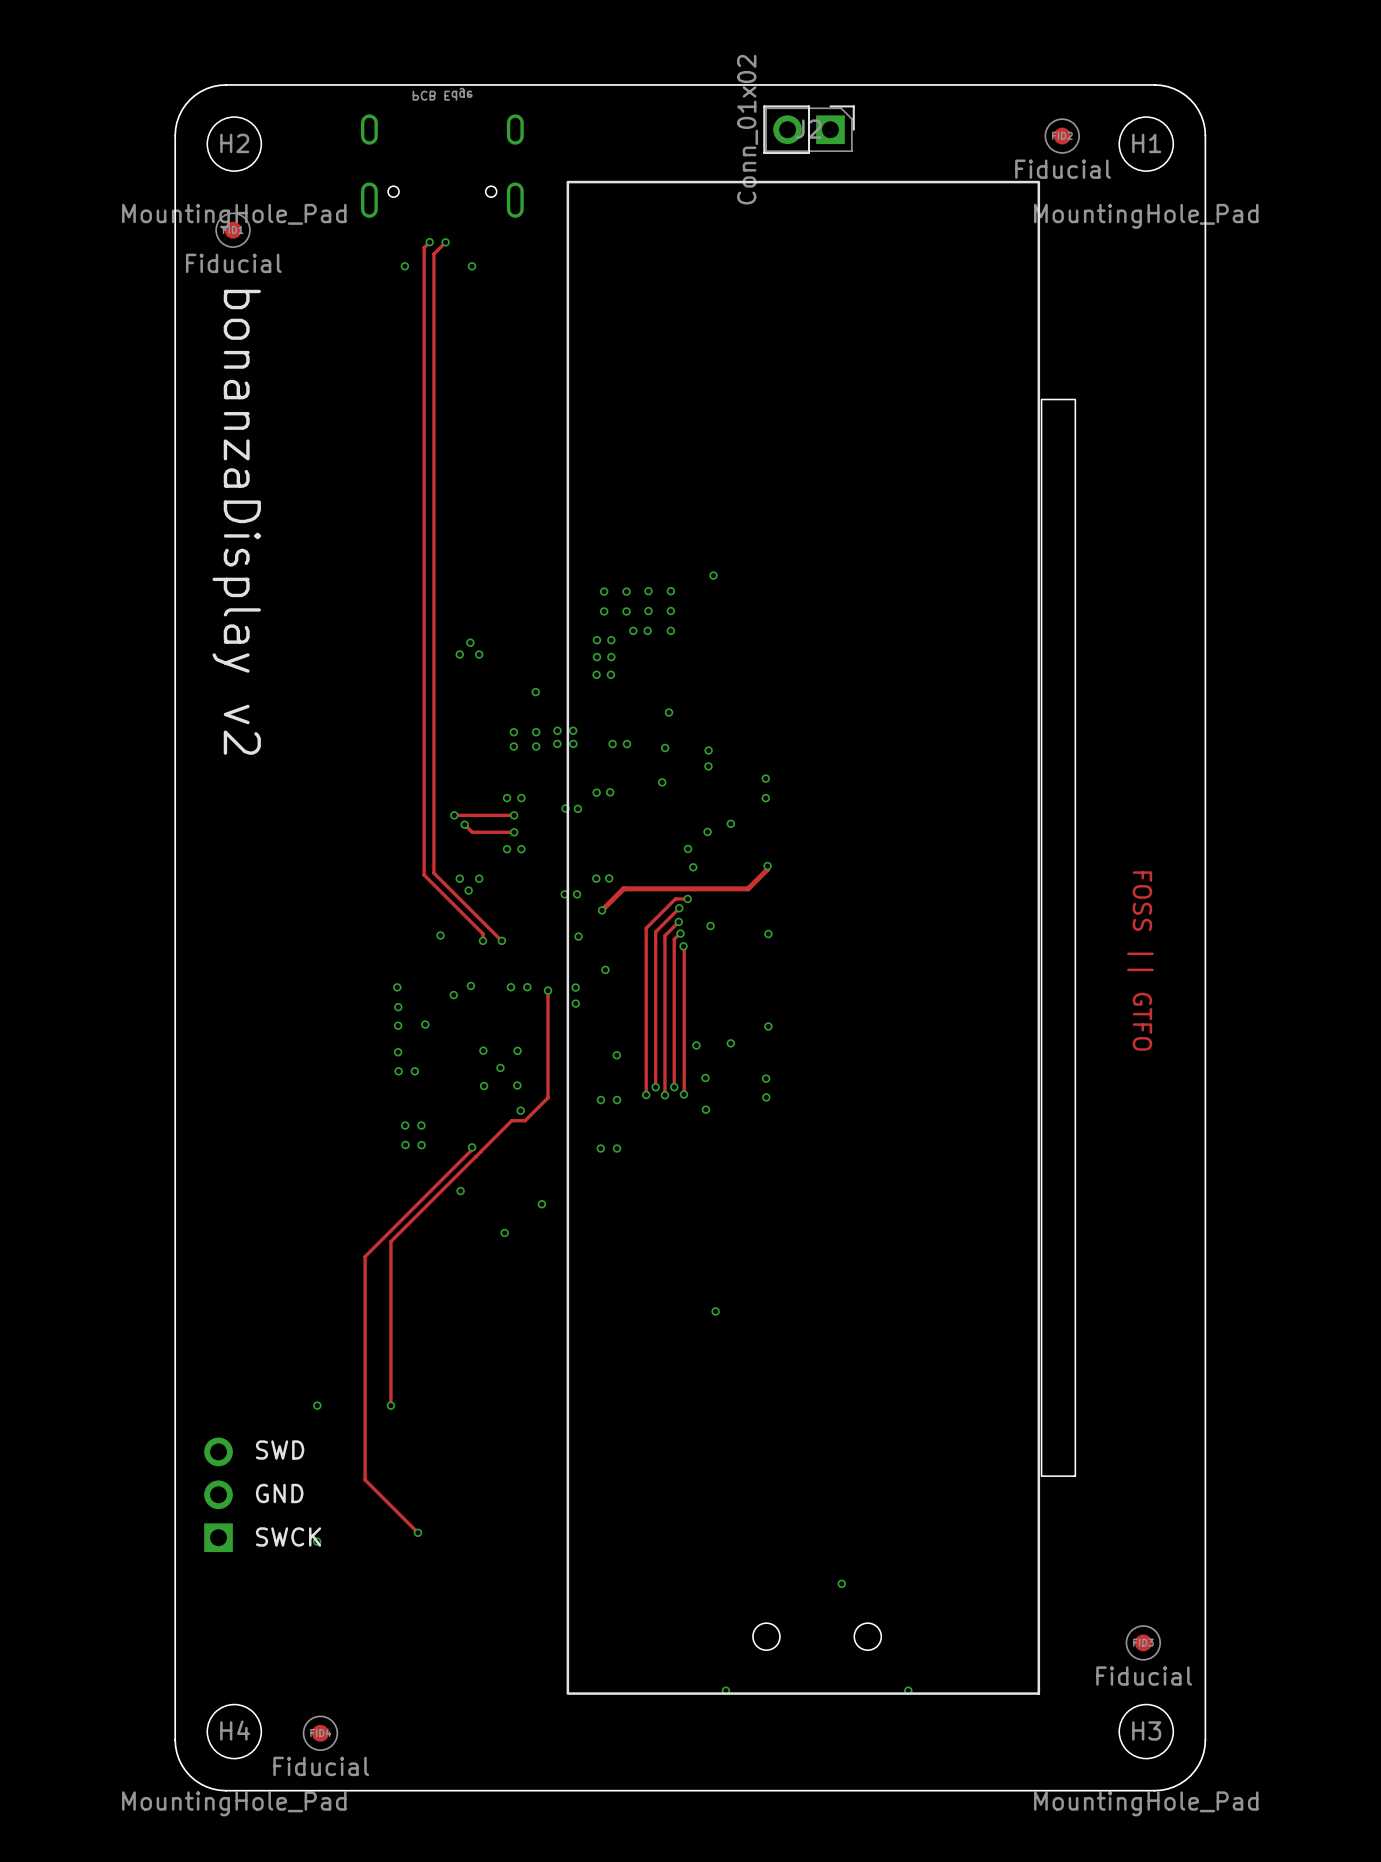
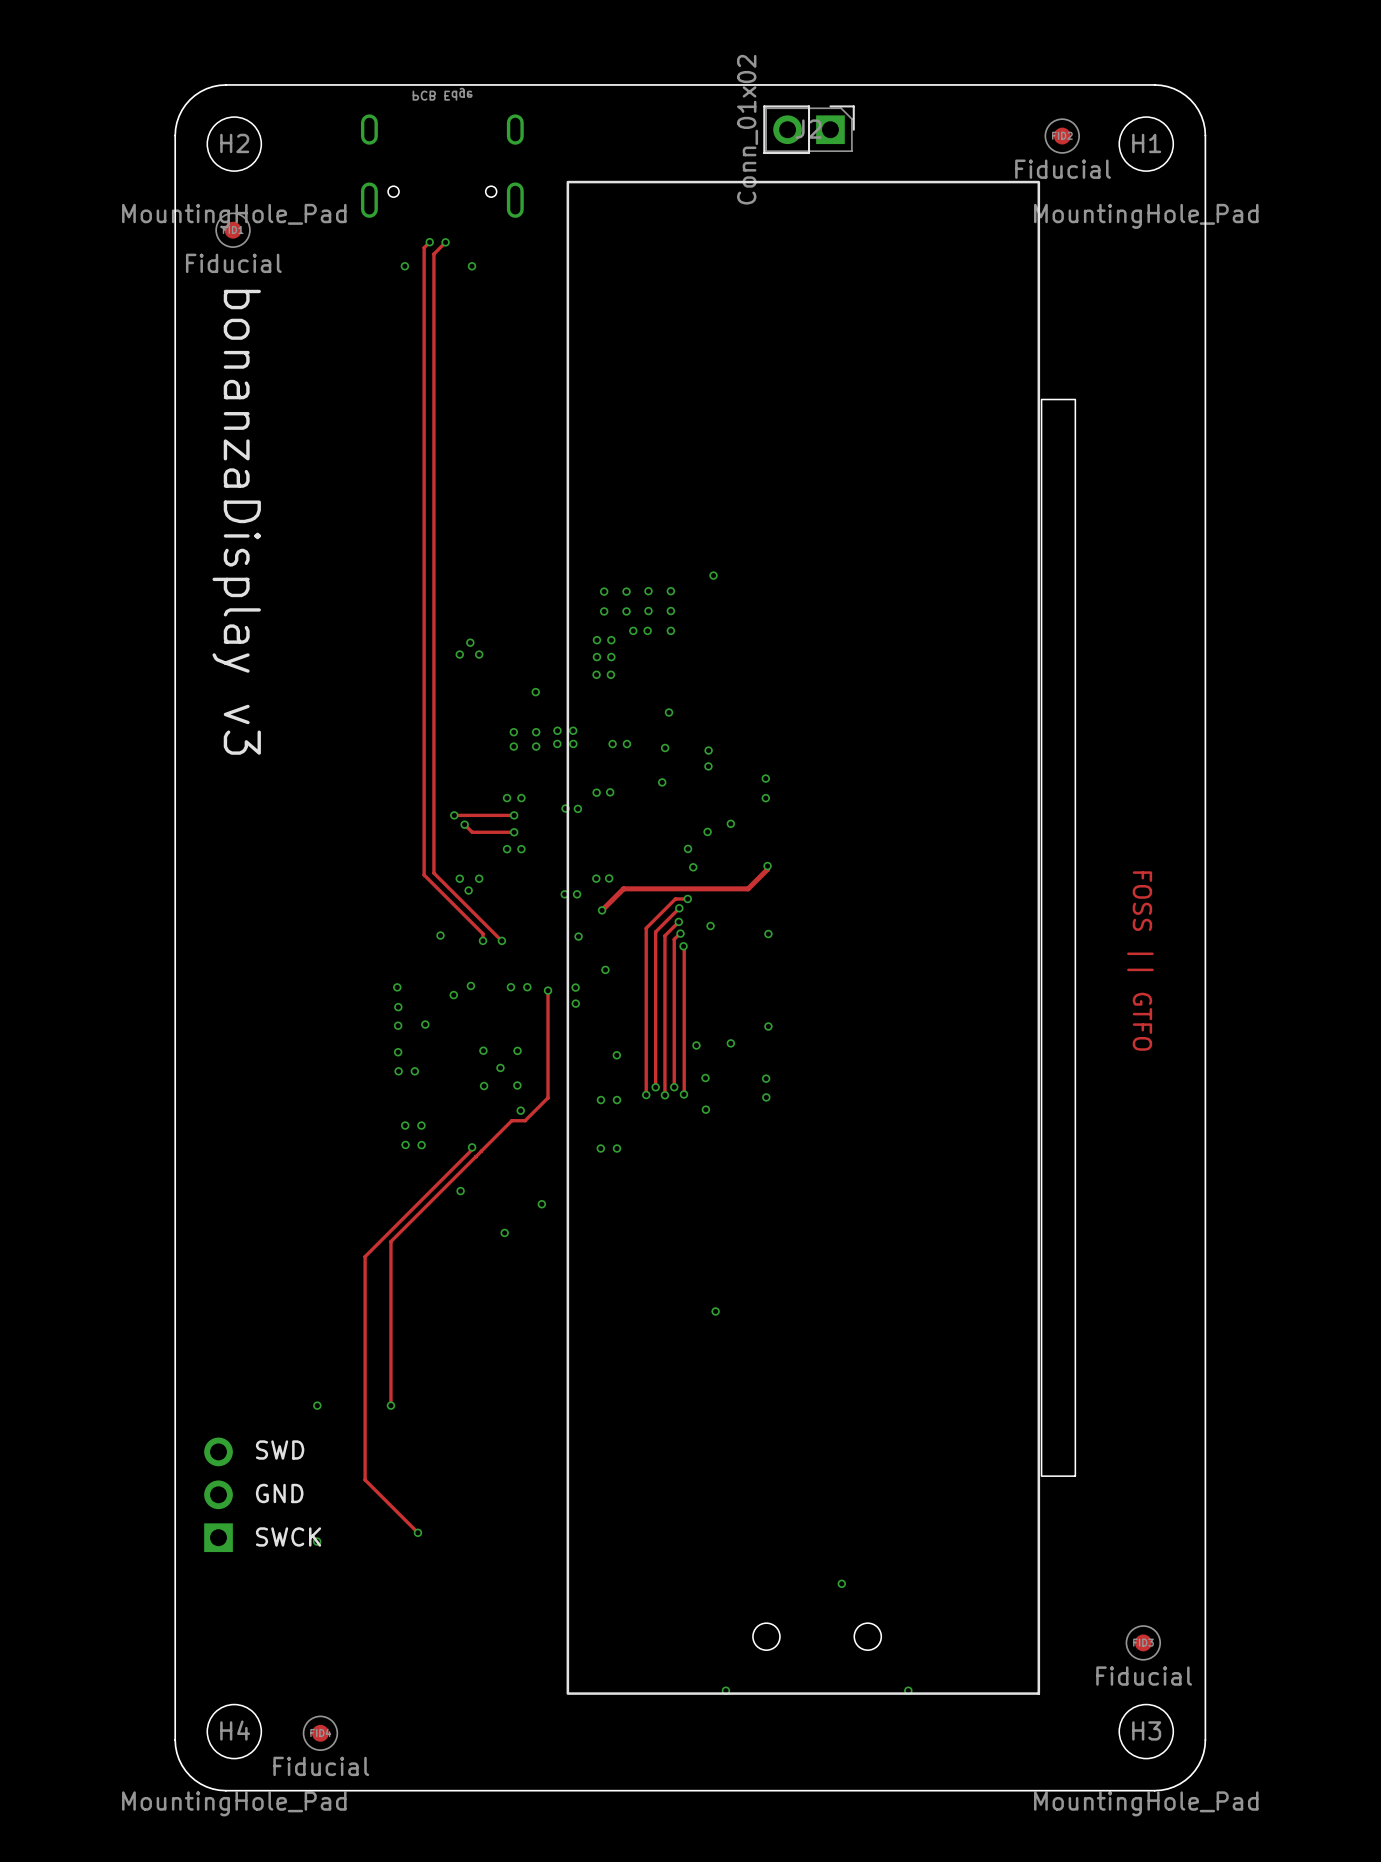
text: bonanzaDisplay v2 (236, 522) -> bonanzaDisplay v3 (236, 522)

